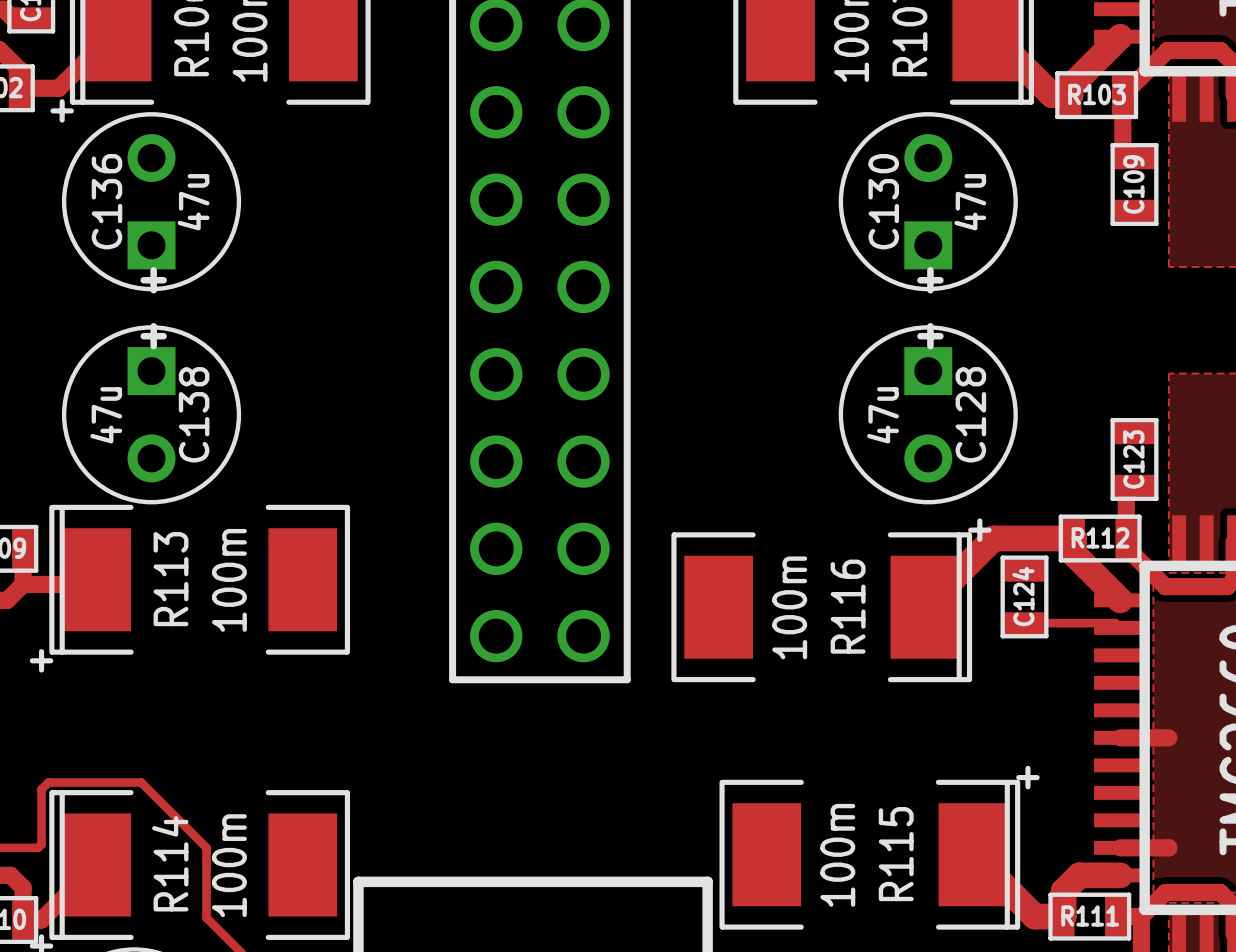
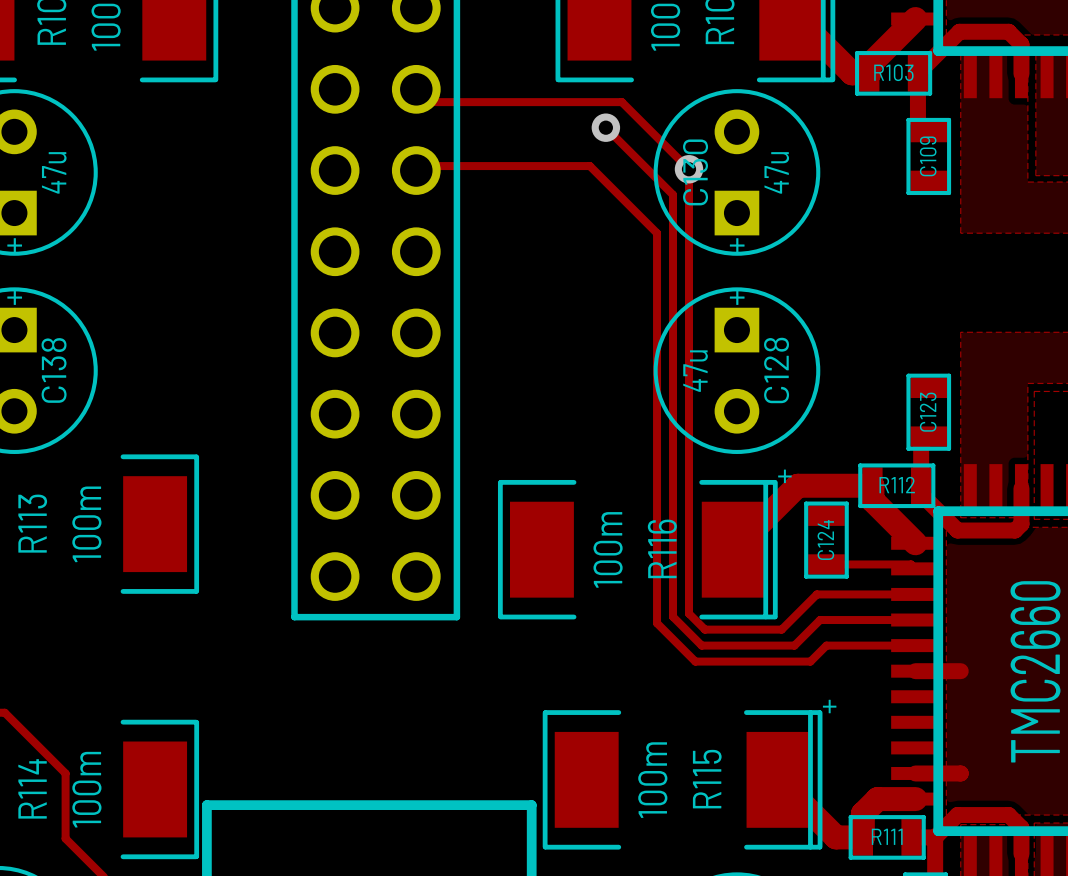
track: none -> (416, 89) (429, 102) (621, 102) (688, 169) (688, 613) (704, 629) (781, 629) (816, 594) (915, 594)
track: none -> (605, 127) (673, 194) (673, 616) (701, 645) (794, 645) (820, 620) (915, 620)
via: none -> (605, 127)
via: none -> (688, 169)
track: none -> (416, 170) (420, 166) (589, 166) (657, 233) (657, 623) (695, 661) (810, 661) (826, 645) (915, 645)

